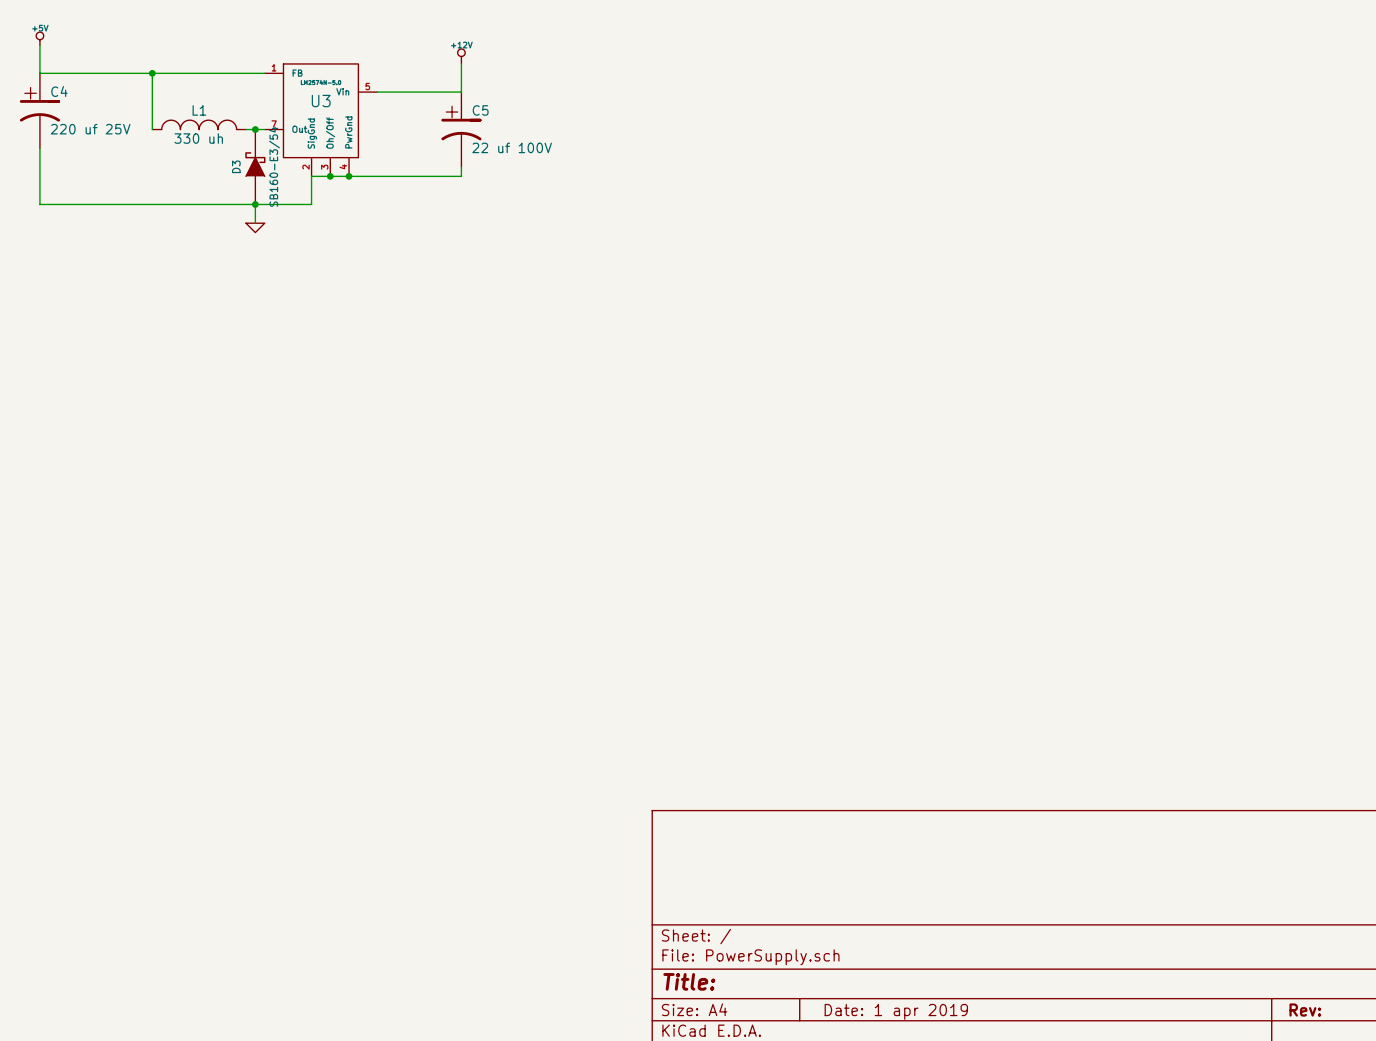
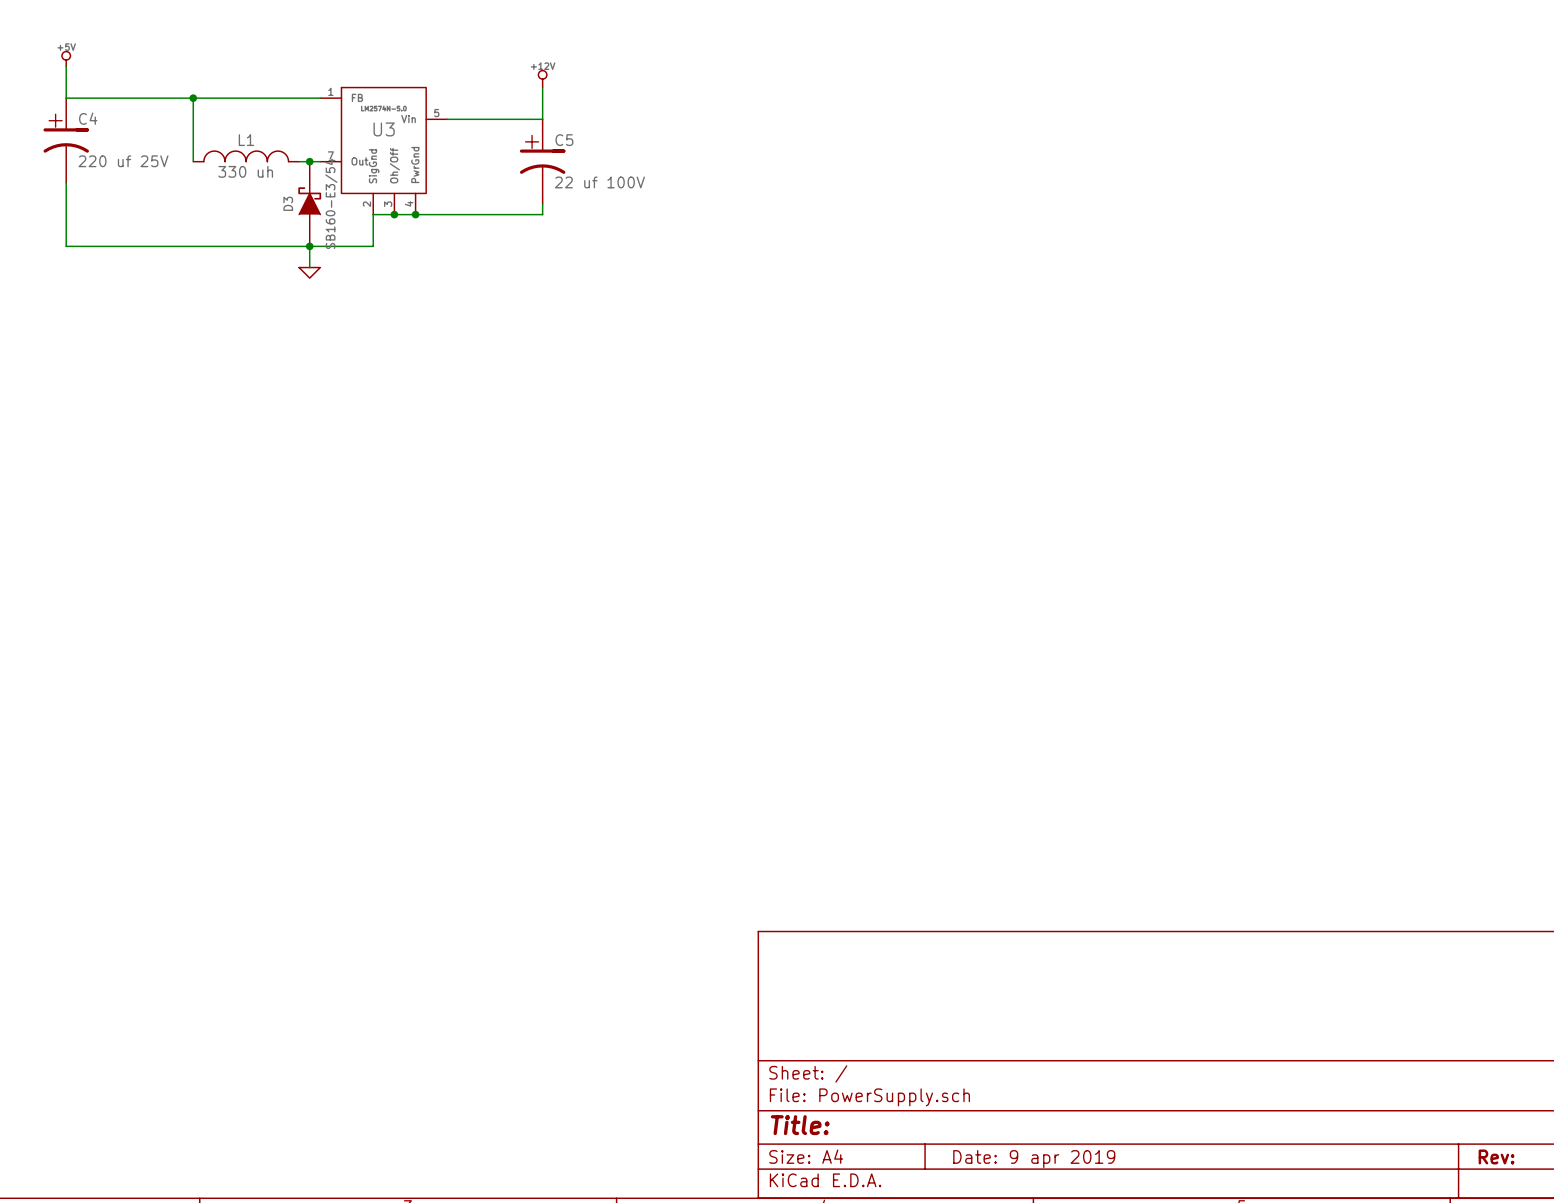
title block: Date: 1 apr 2019 (896, 1011) -> Date: 9 apr 2019 (1034, 1159)

